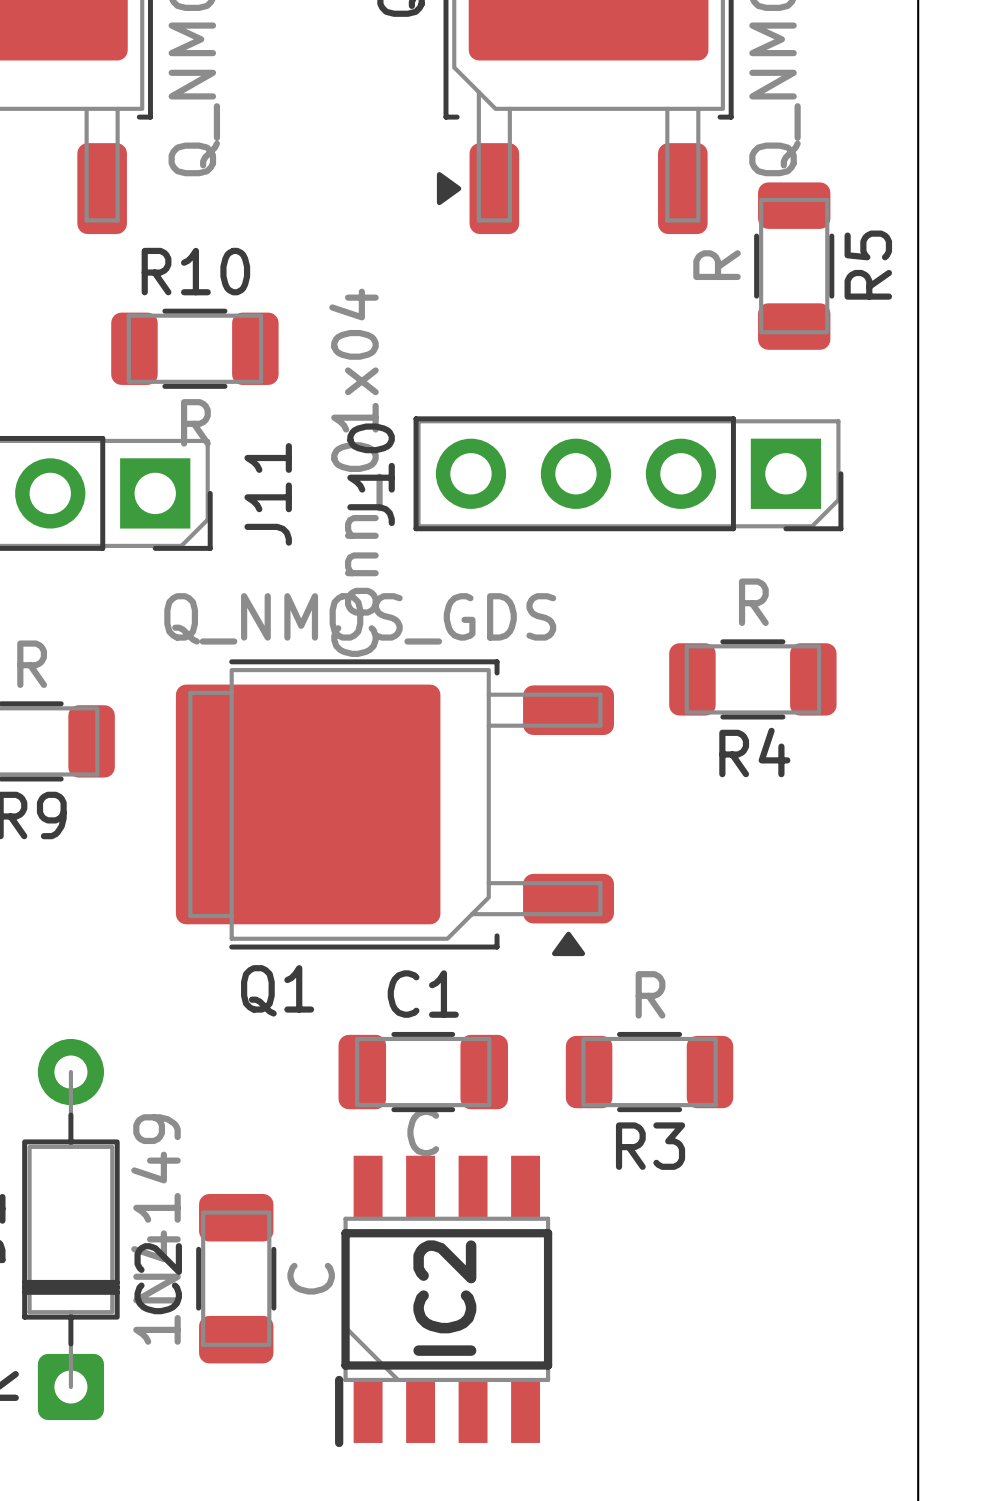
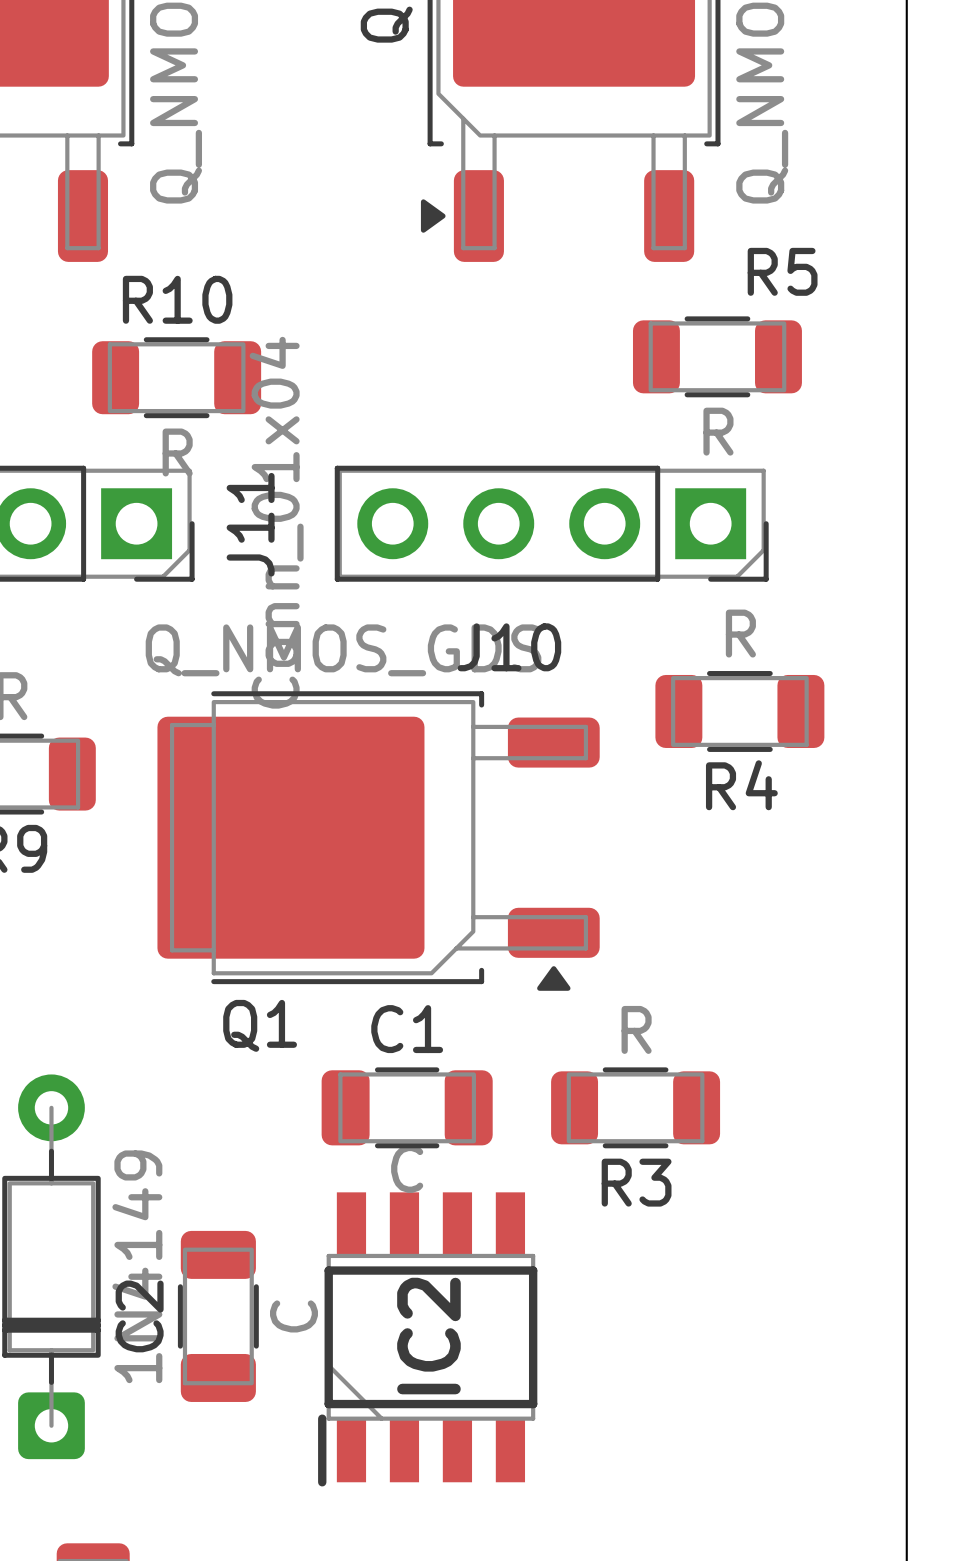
R5 value position: R (717, 265) -> R (718, 431)
R5 name position: R5 (868, 265) -> R5 (782, 271)
R5 rotation: 0° (794, 266) -> 90° clockwise (717, 356)
J10 position: (628, 473) -> (551, 523)
J10 name rotation: 0° (371, 474) -> 90° clockwise (509, 647)
J10 name position: J10 (371, 474) -> J10 (509, 647)

